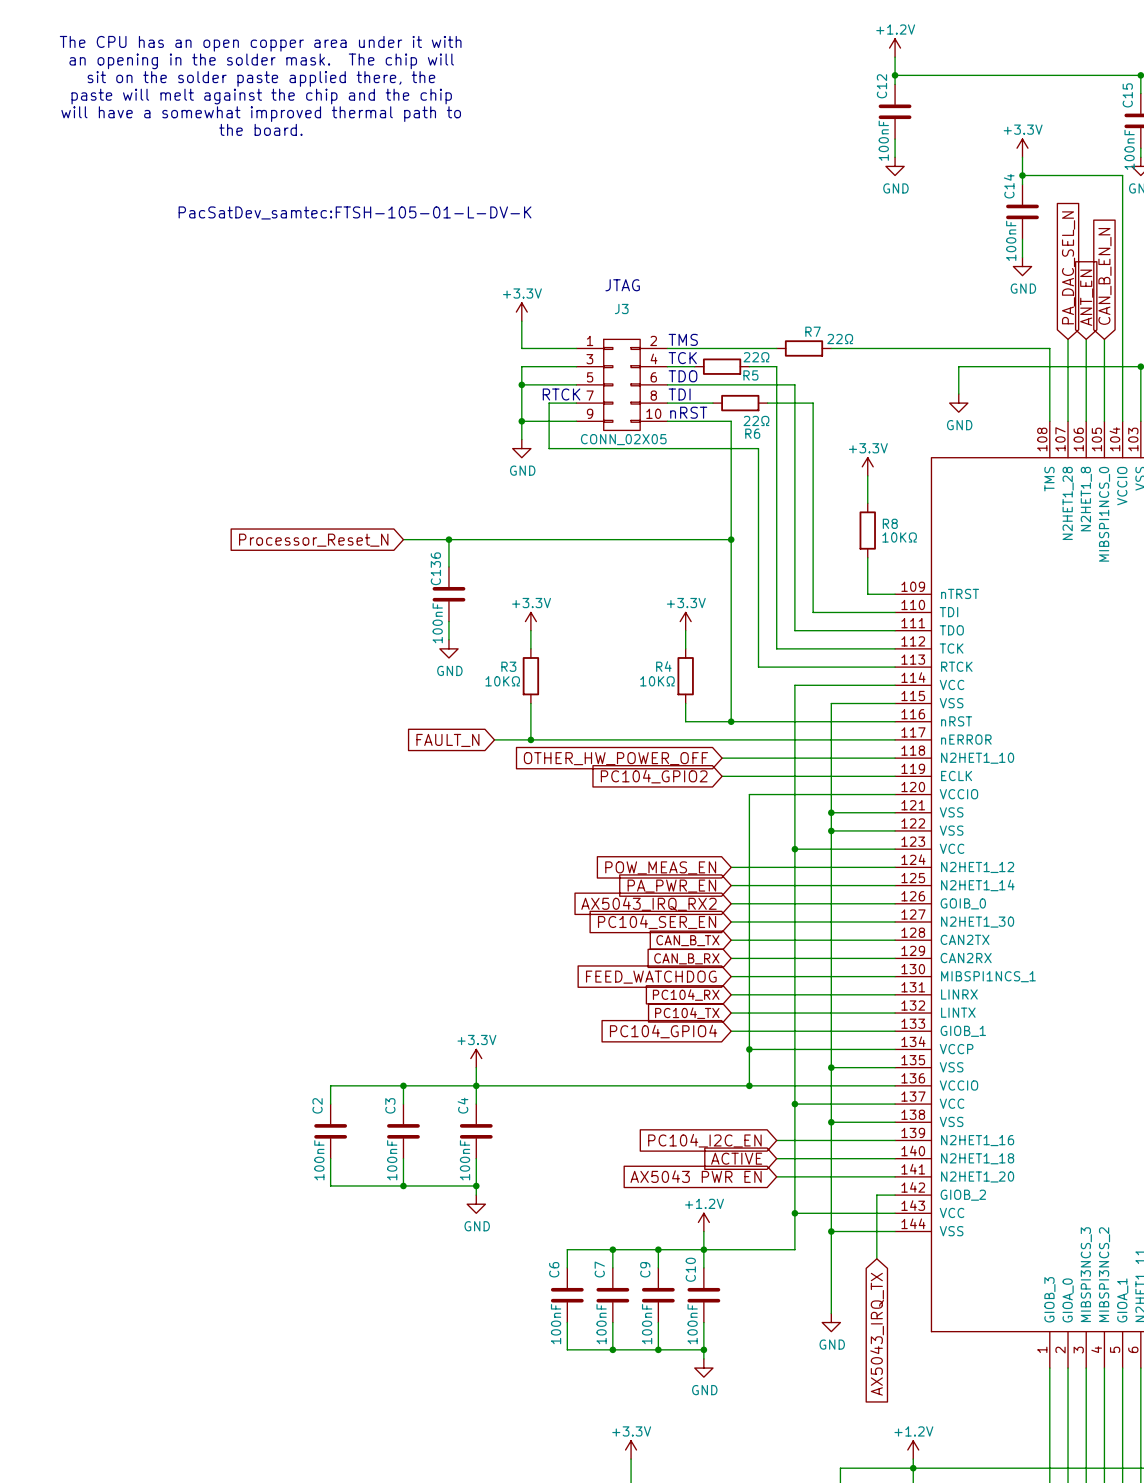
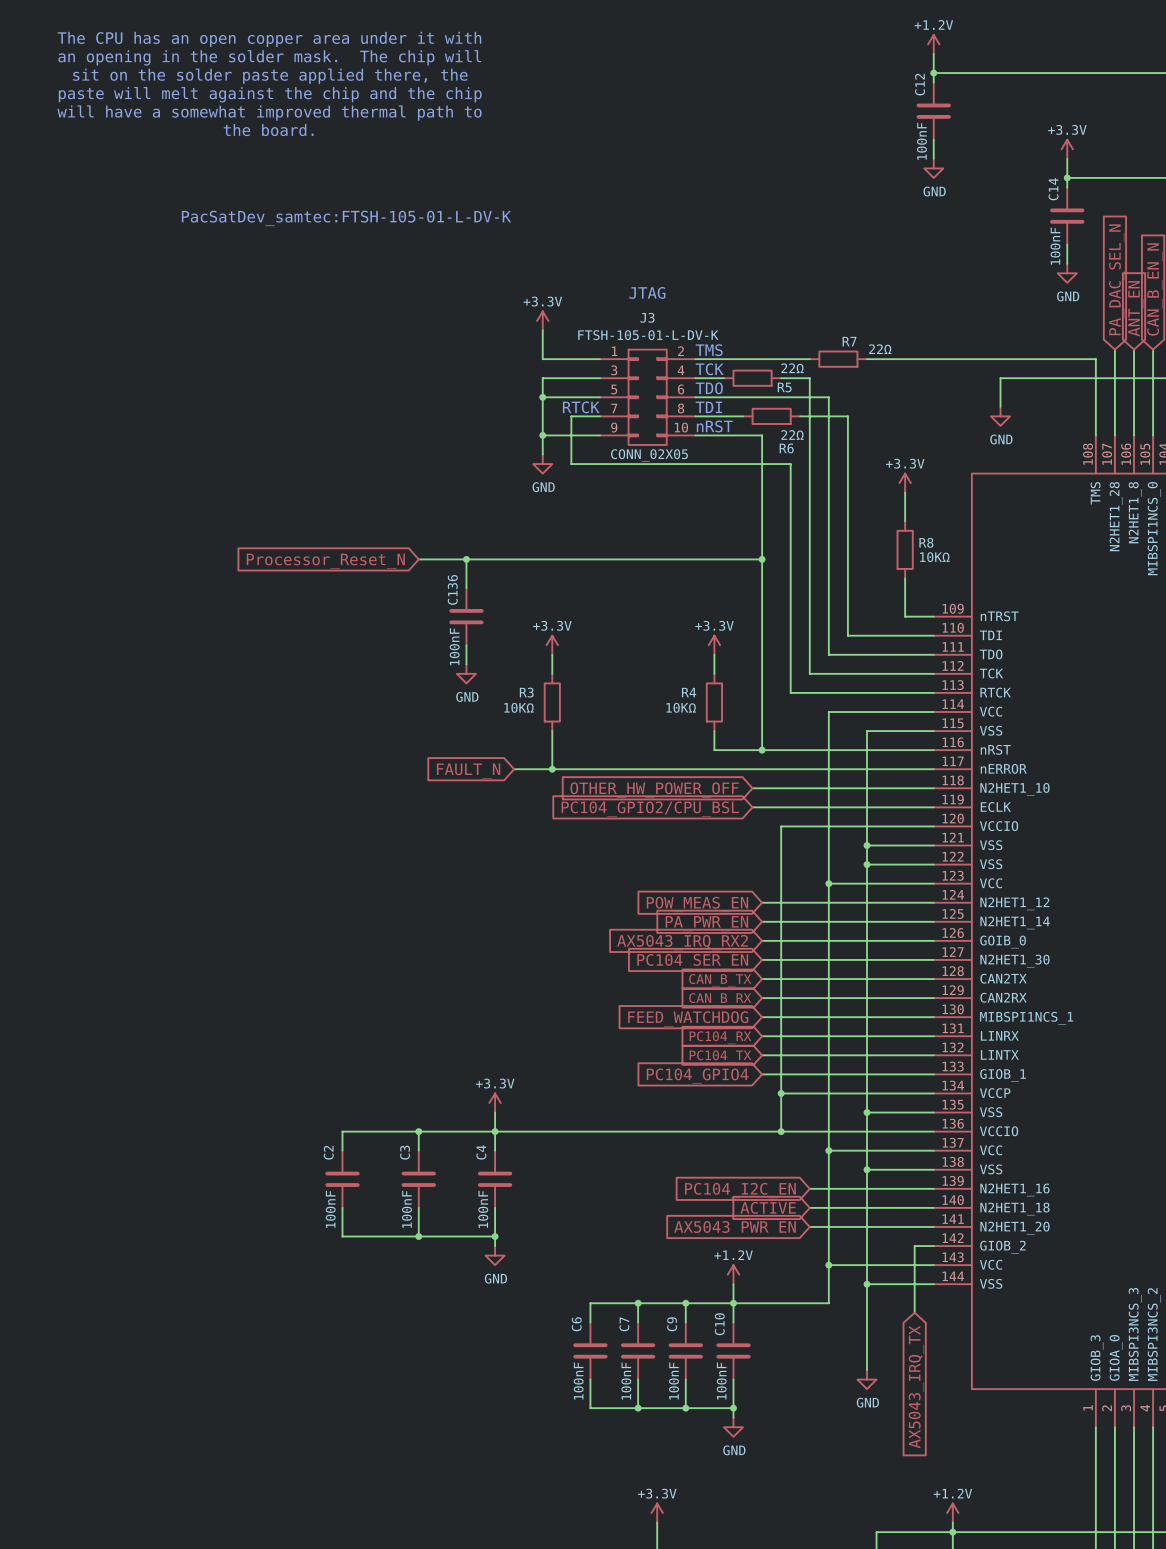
J3 value: none -> FTSH-105-01-L-DV-K (648, 335)
global label: PC104_GPIO2 (654, 776) -> PC104_GPIO2/CPU_BSL (650, 809)

